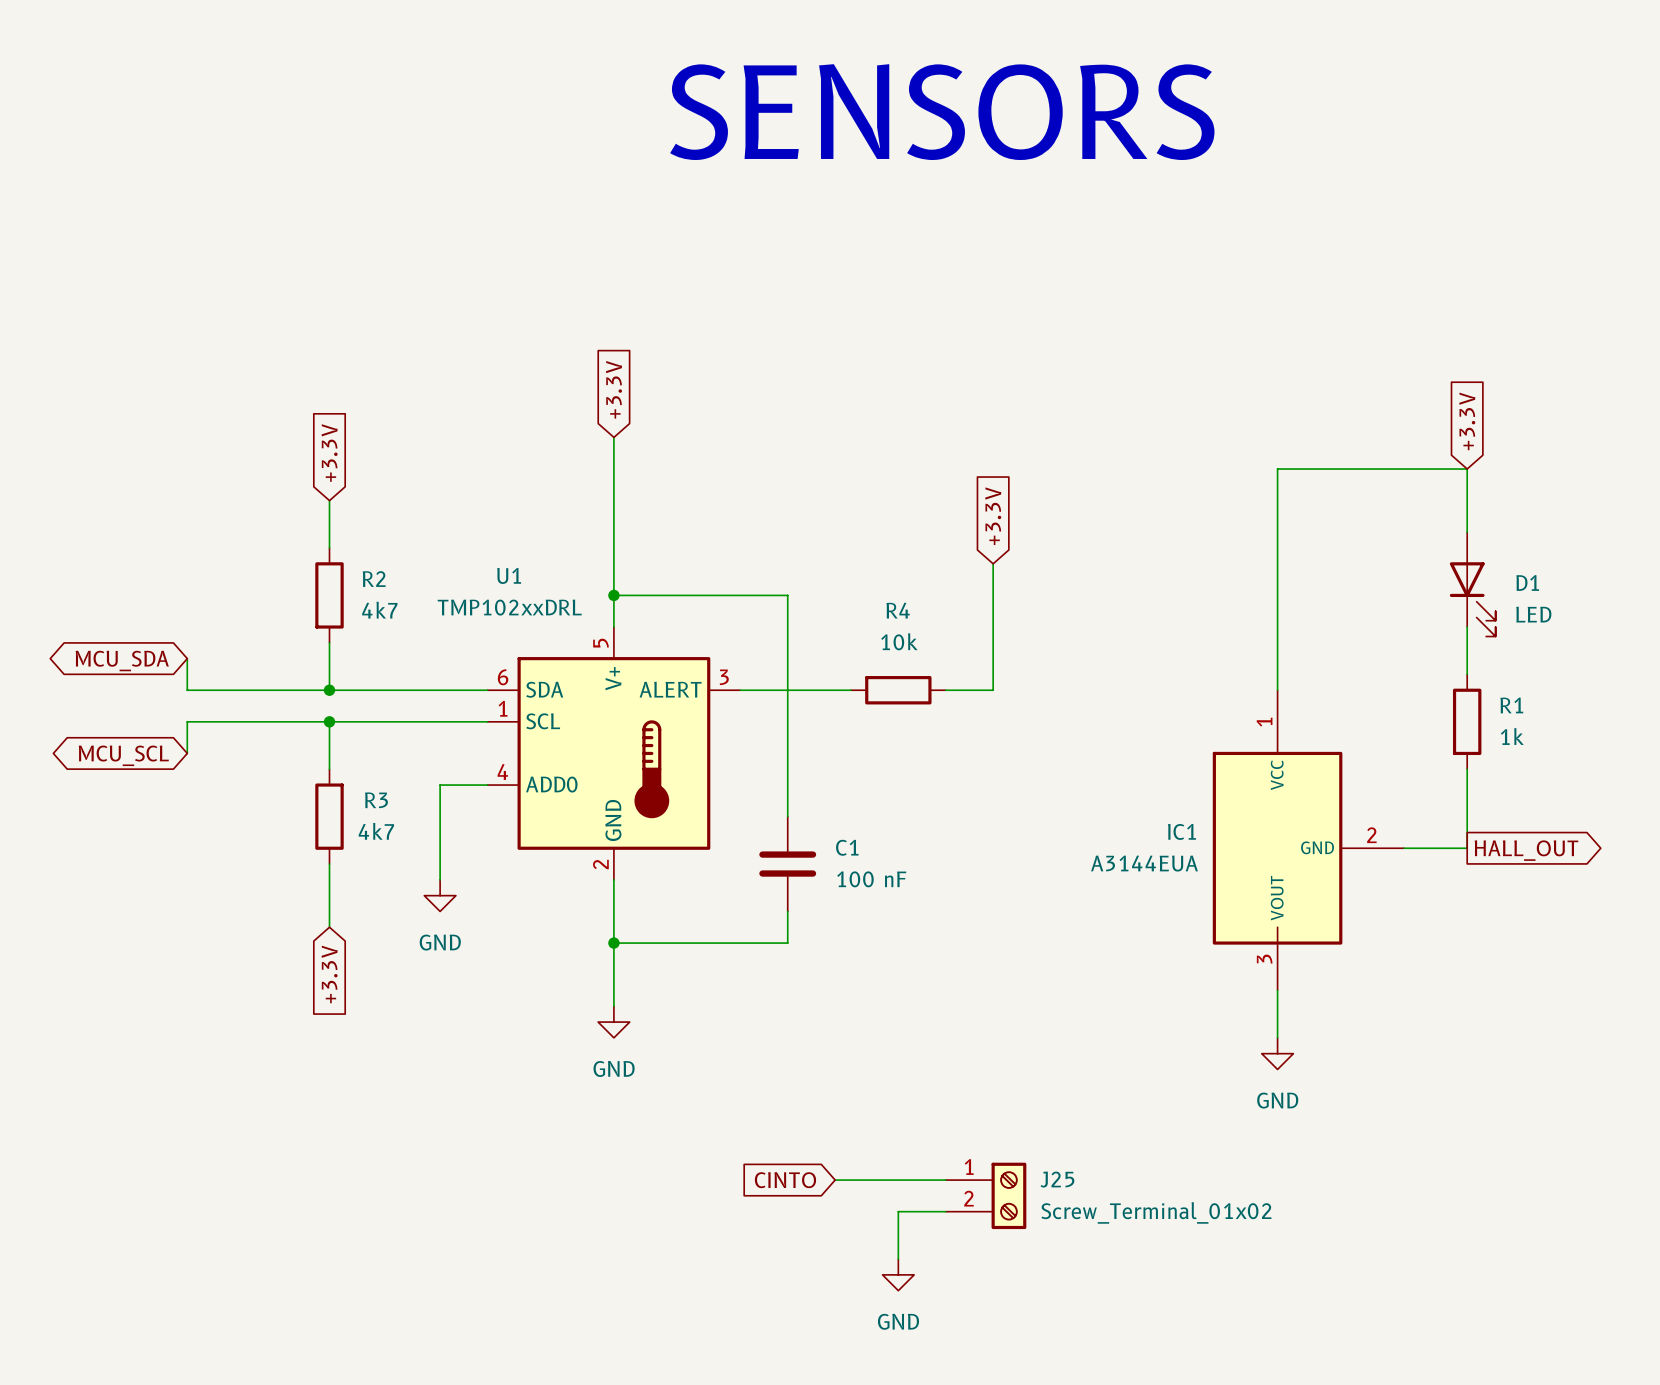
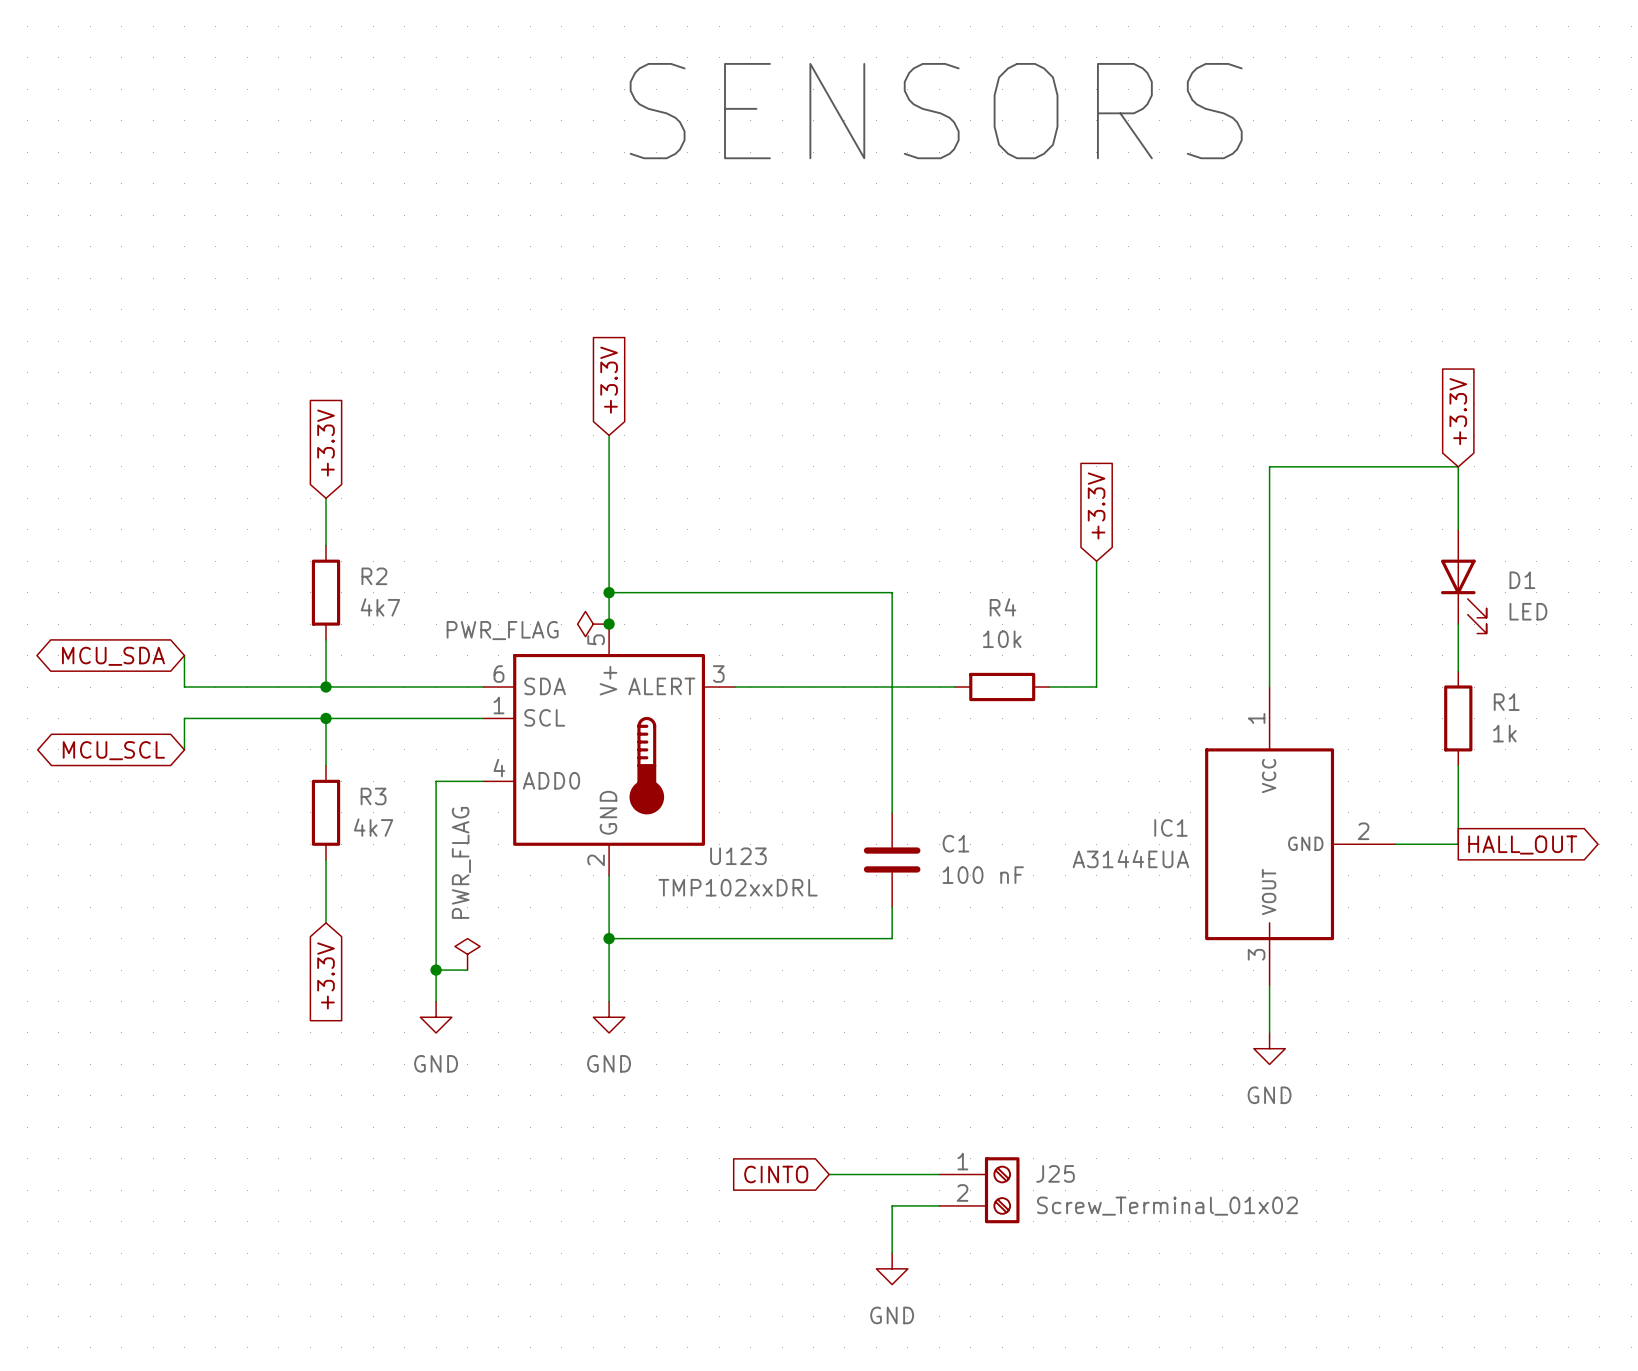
global label position: +3.3V (993, 516) -> +3.3V (1096, 505)
wire: (993, 563) (993, 690) (961, 690) -> none
wire: none -> (1096, 561) (1096, 687) (1049, 687)
U1 name: U1 (509, 575) -> U123 (738, 856)
wire: (787, 595) (787, 816) -> (782, 592) (892, 592) (892, 812)
U1 value position: TMP102xxDRL (509, 607) -> TMP102xxDRL (738, 887)
power symbol: none -> PWR_FLAG (593, 624)
junction: none -> (609, 624)
wire: none -> (844, 687) (939, 687)
R4 position: (898, 690) -> (1002, 687)
C1 position: (787, 864) -> (892, 859)
wire: none -> (436, 875) (436, 1001)
power symbol position: GND (440, 895) -> GND (436, 1017)
wire: (787, 911) (787, 943) -> (892, 907) (892, 938) (782, 938)
power symbol: none -> PWR_FLAG (467, 954)
wire: none -> (436, 970) (467, 970)
junction: none -> (436, 970)

